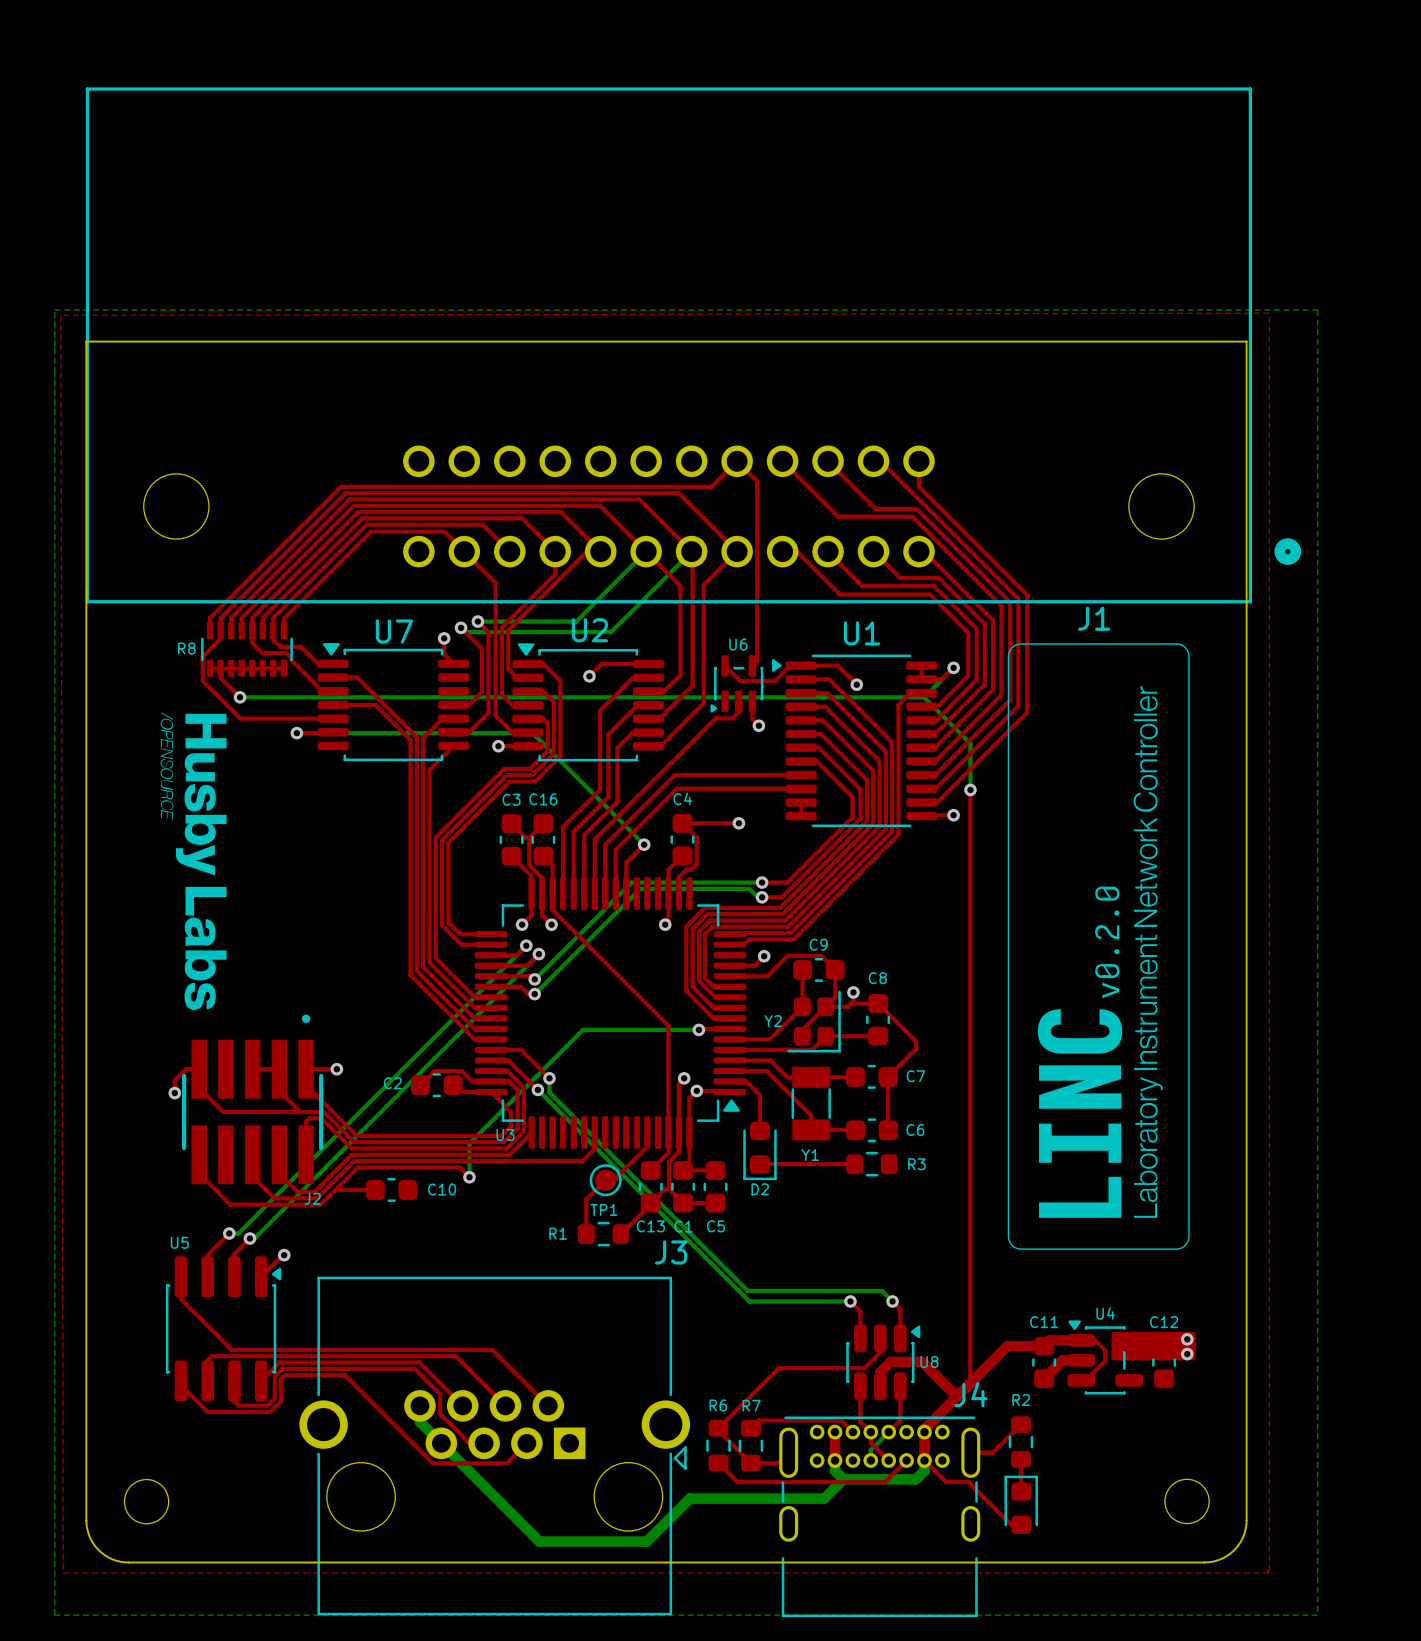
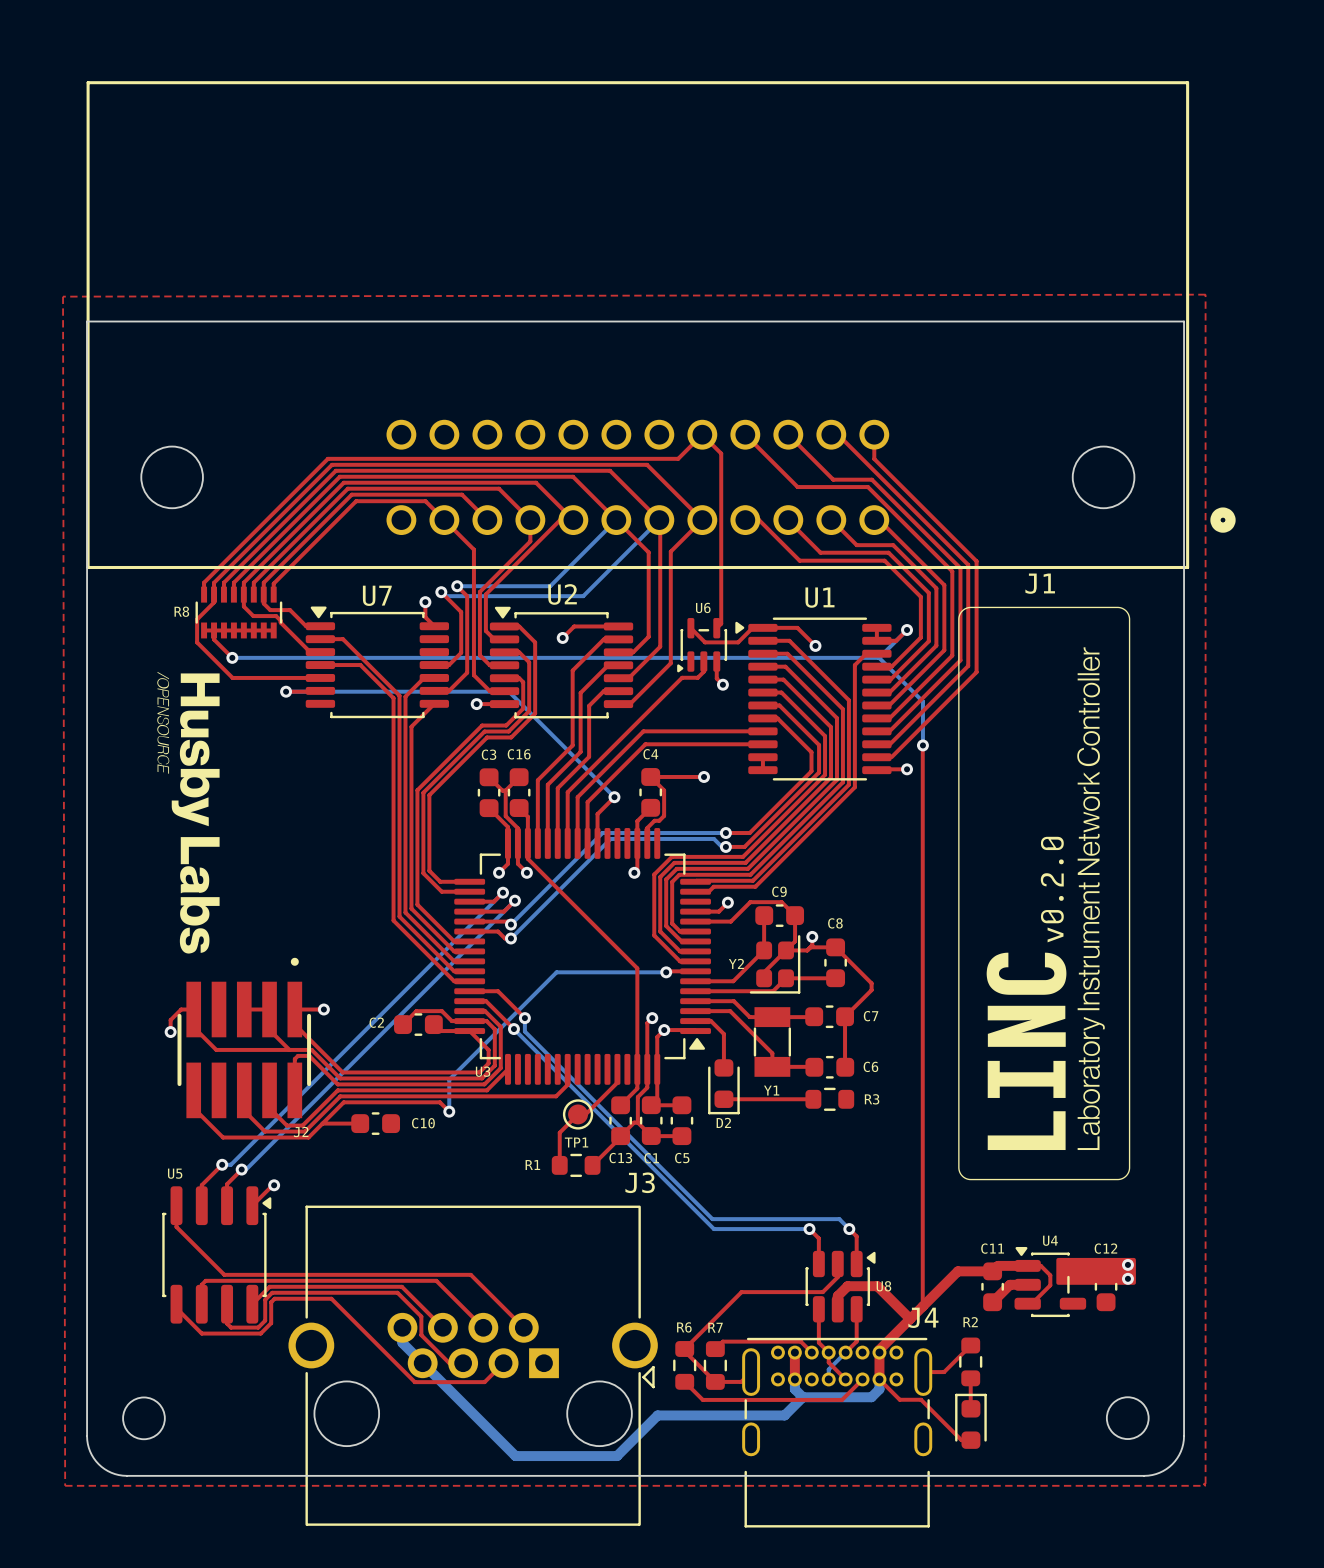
bottom zone outline: (54, 310) (1317, 310) (1317, 1615) (54, 1615) (54, 310) -> none

